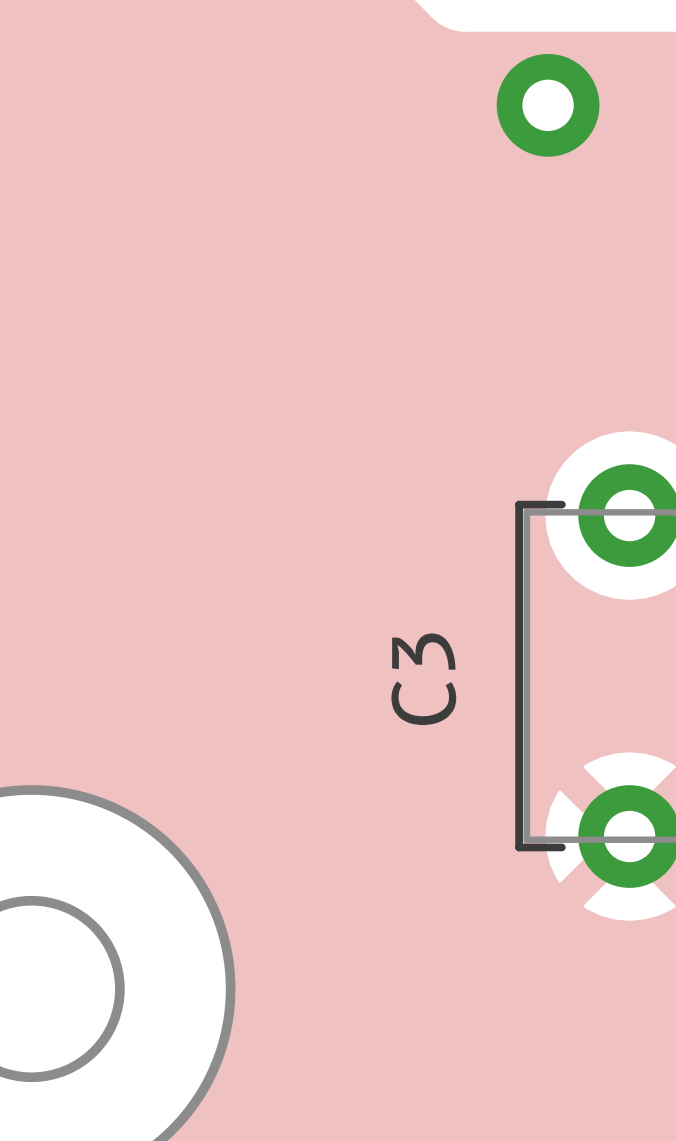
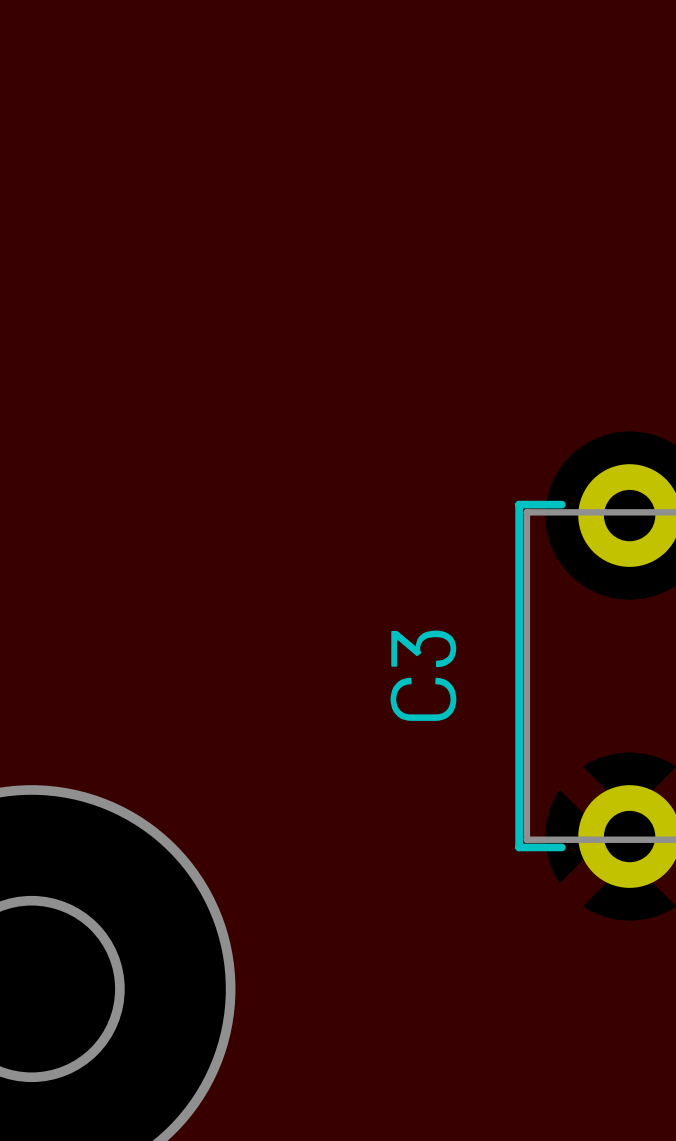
via: (548, 105) -> none

